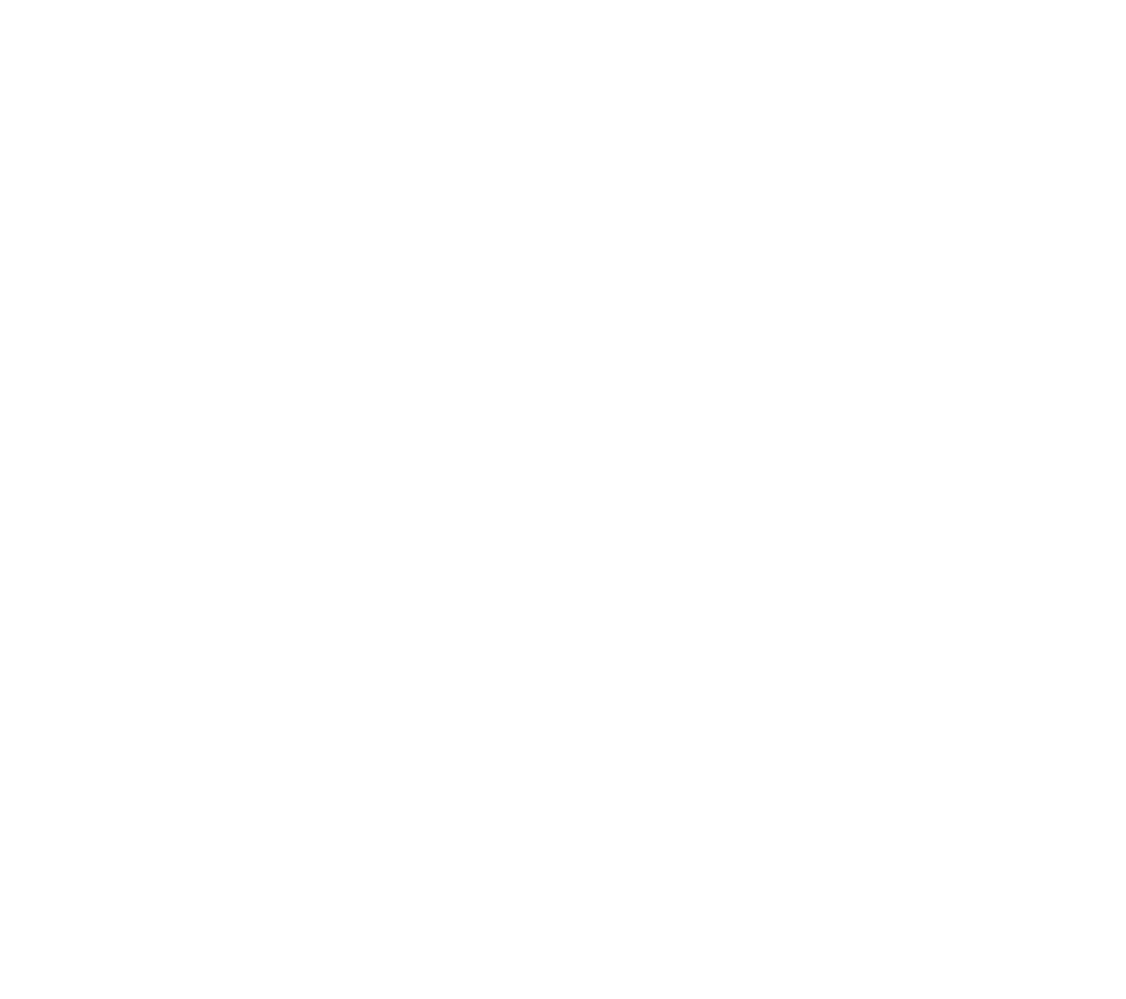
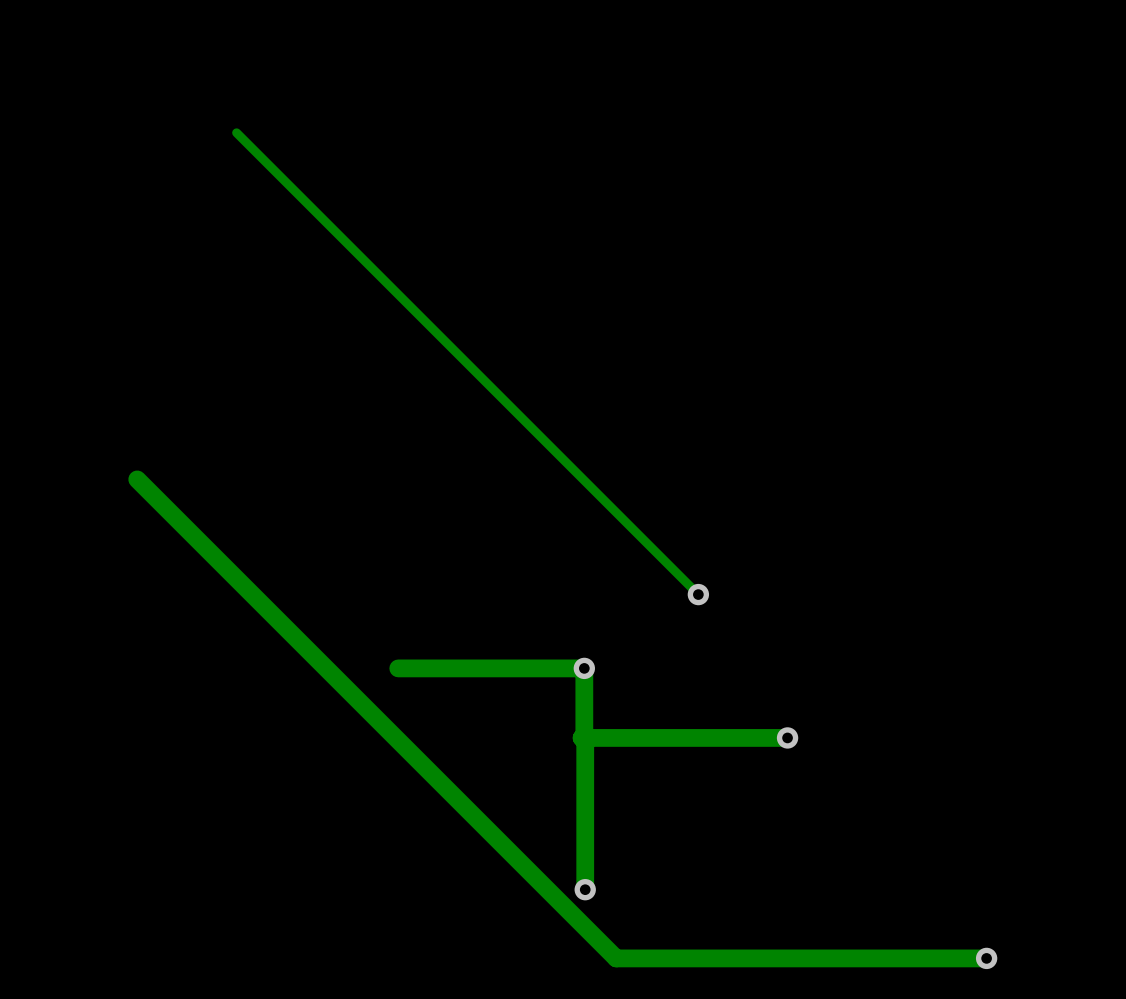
track: none -> (236, 132) (698, 594)
track: none -> (137, 479) (616, 958) (986, 958)
via: none -> (698, 594)
track: none -> (398, 668) (584, 668) (584, 740)
via: none -> (584, 668)
track: none -> (787, 737) (581, 737) (585, 741) (585, 889)
via: none -> (787, 737)
via: none -> (585, 889)
via: none -> (986, 958)

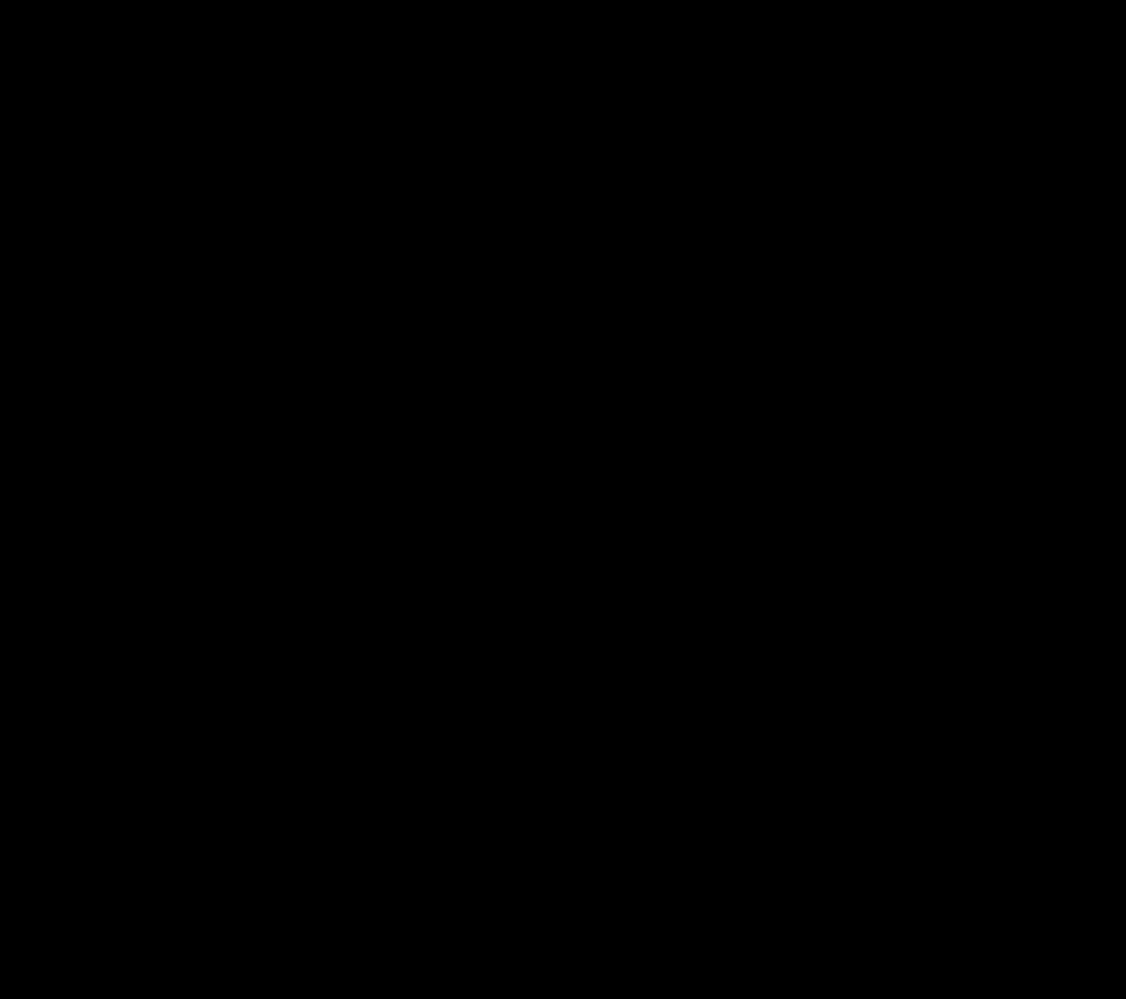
track: (236, 132) (698, 594) -> none
track: (137, 479) (616, 958) (986, 958) -> none
via: (698, 594) -> none
track: (398, 668) (584, 668) (584, 740) -> none
via: (584, 668) -> none
track: (787, 737) (581, 737) (585, 741) (585, 889) -> none
via: (787, 737) -> none
via: (585, 889) -> none
via: (986, 958) -> none

